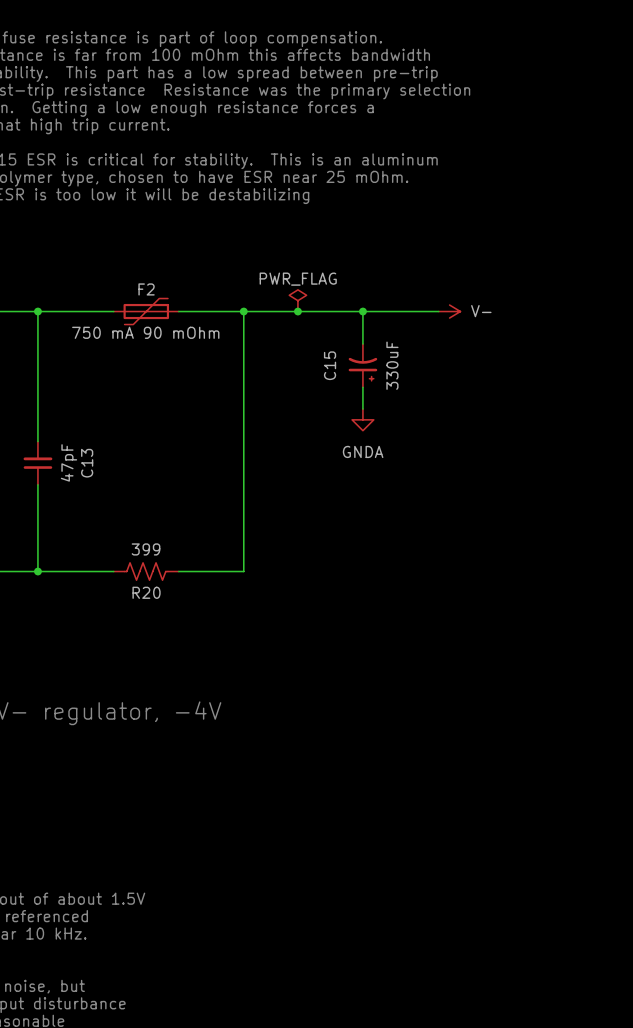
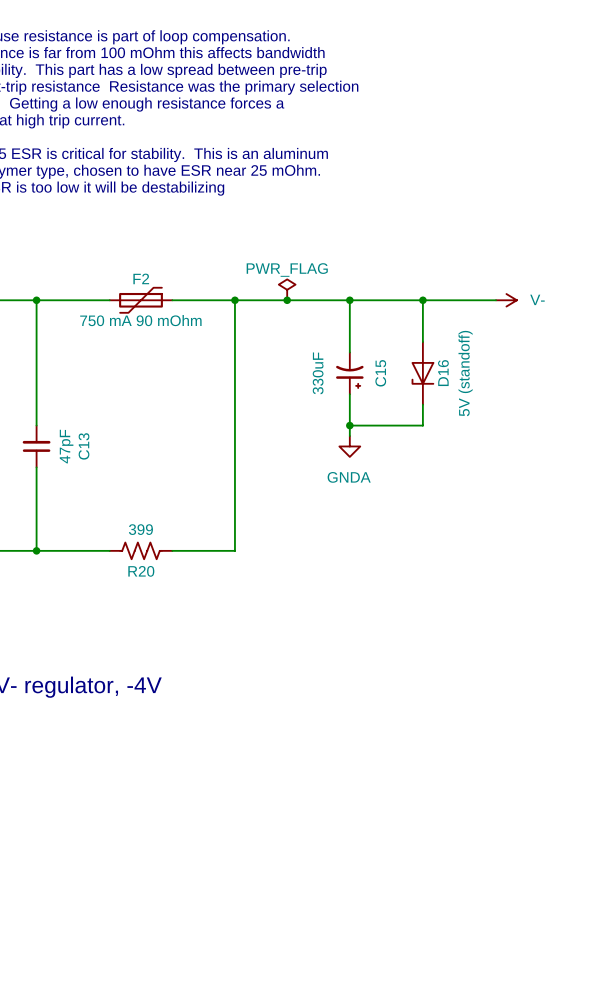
junction: none -> (422, 300)
power symbol position: V- (449, 311) -> V- (506, 300)
wire: none -> (496, 300) (422, 300) (422, 342)
C15 name position: C15 (330, 365) -> C15 (380, 373)
C15 position: (362, 365) -> (349, 373)
C15 value position: 330uF (392, 365) -> 330uF (318, 373)
D16: none -> 5V (standoff) (422, 373)
power symbol position: GNDA (362, 419) -> GNDA (349, 446)
wire: none -> (422, 404) (422, 425) (349, 425)
junction: none -> (349, 425)

